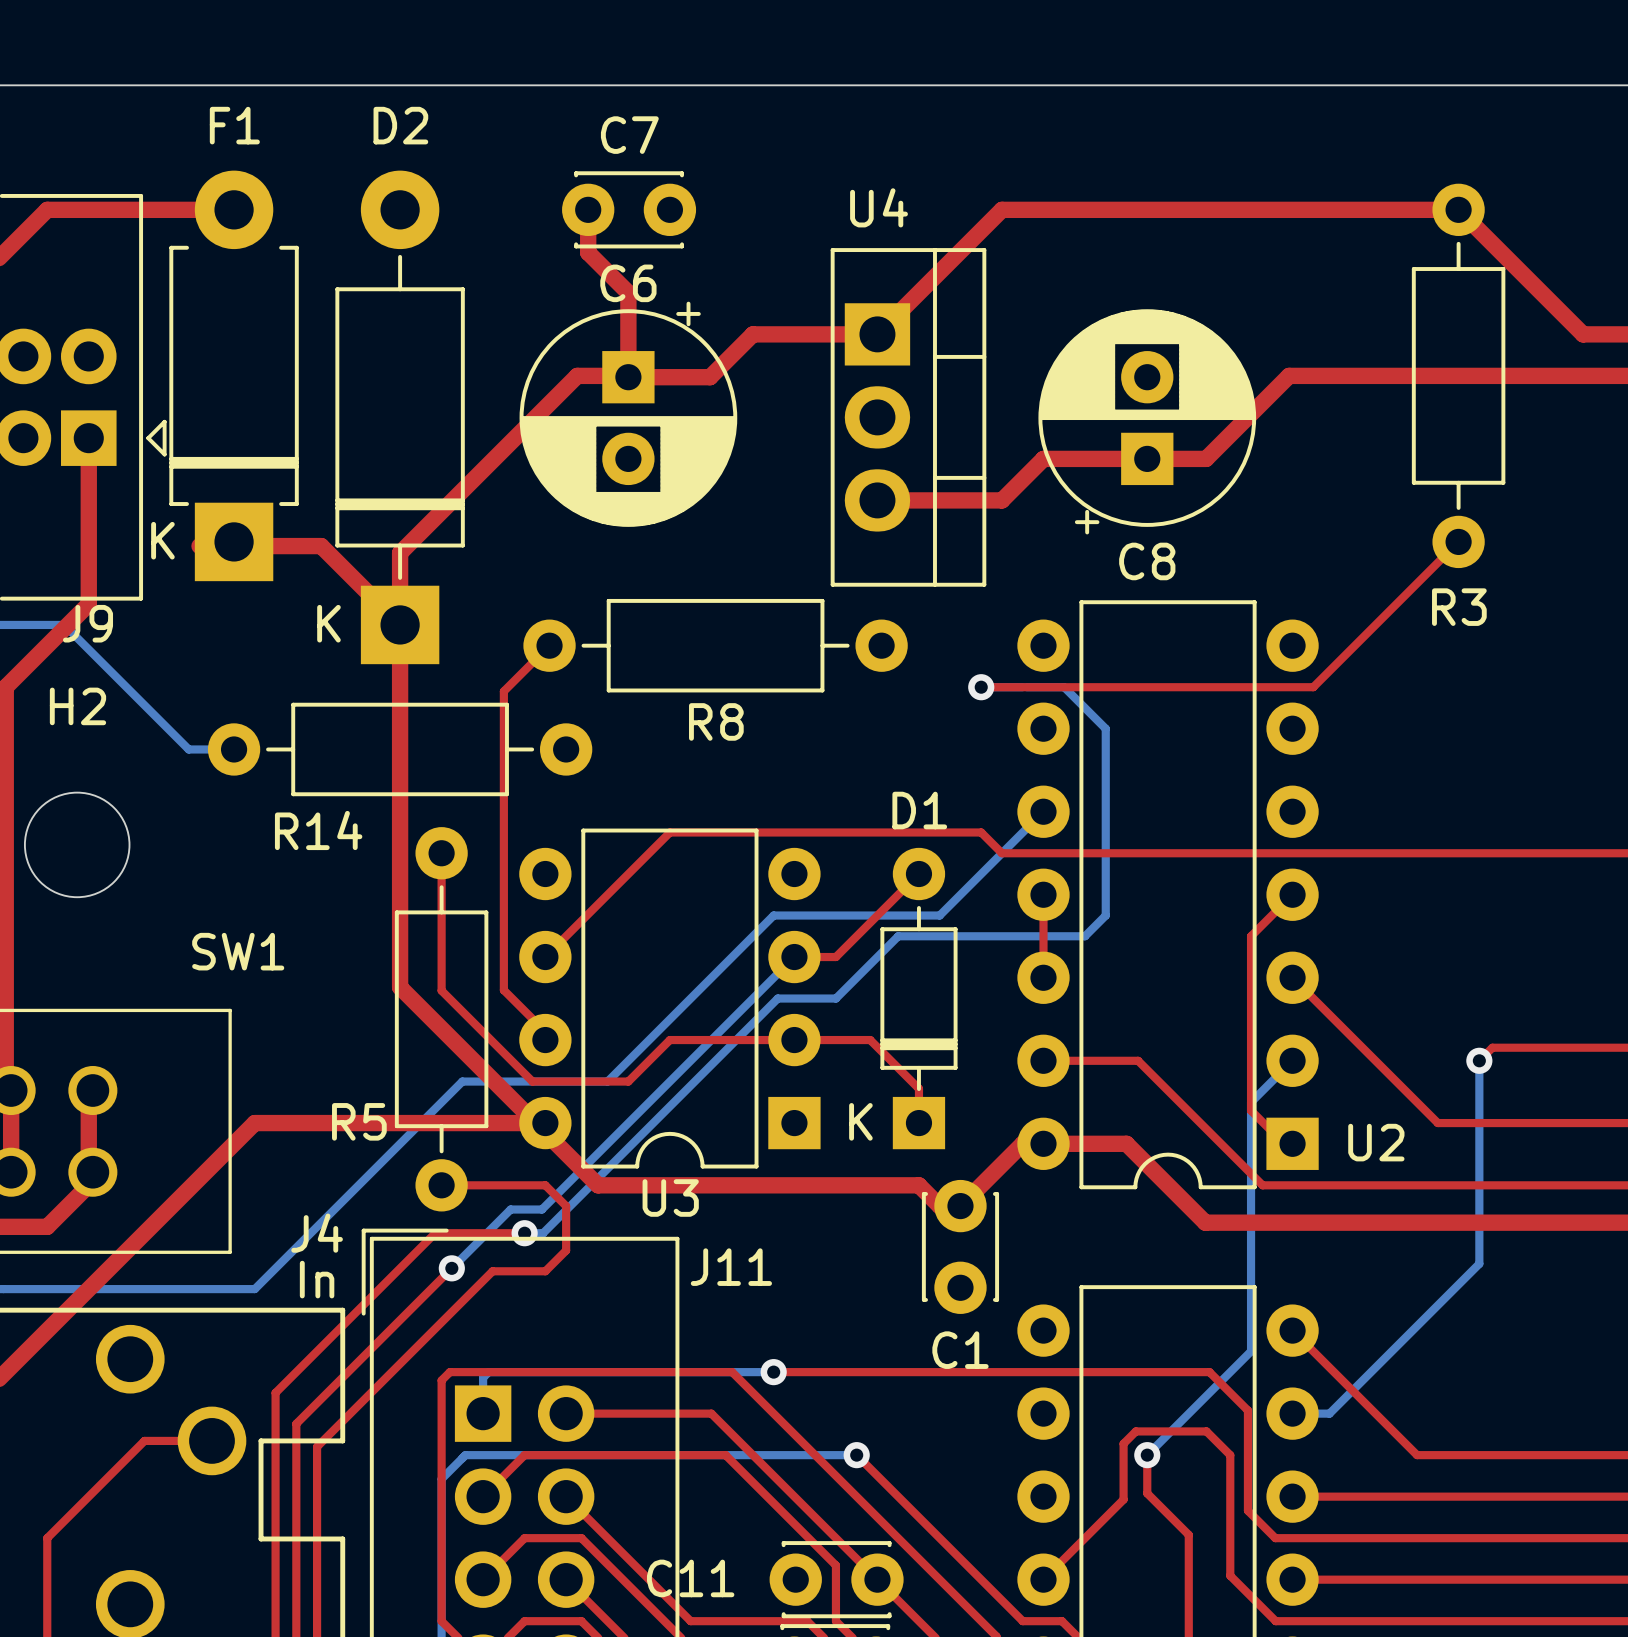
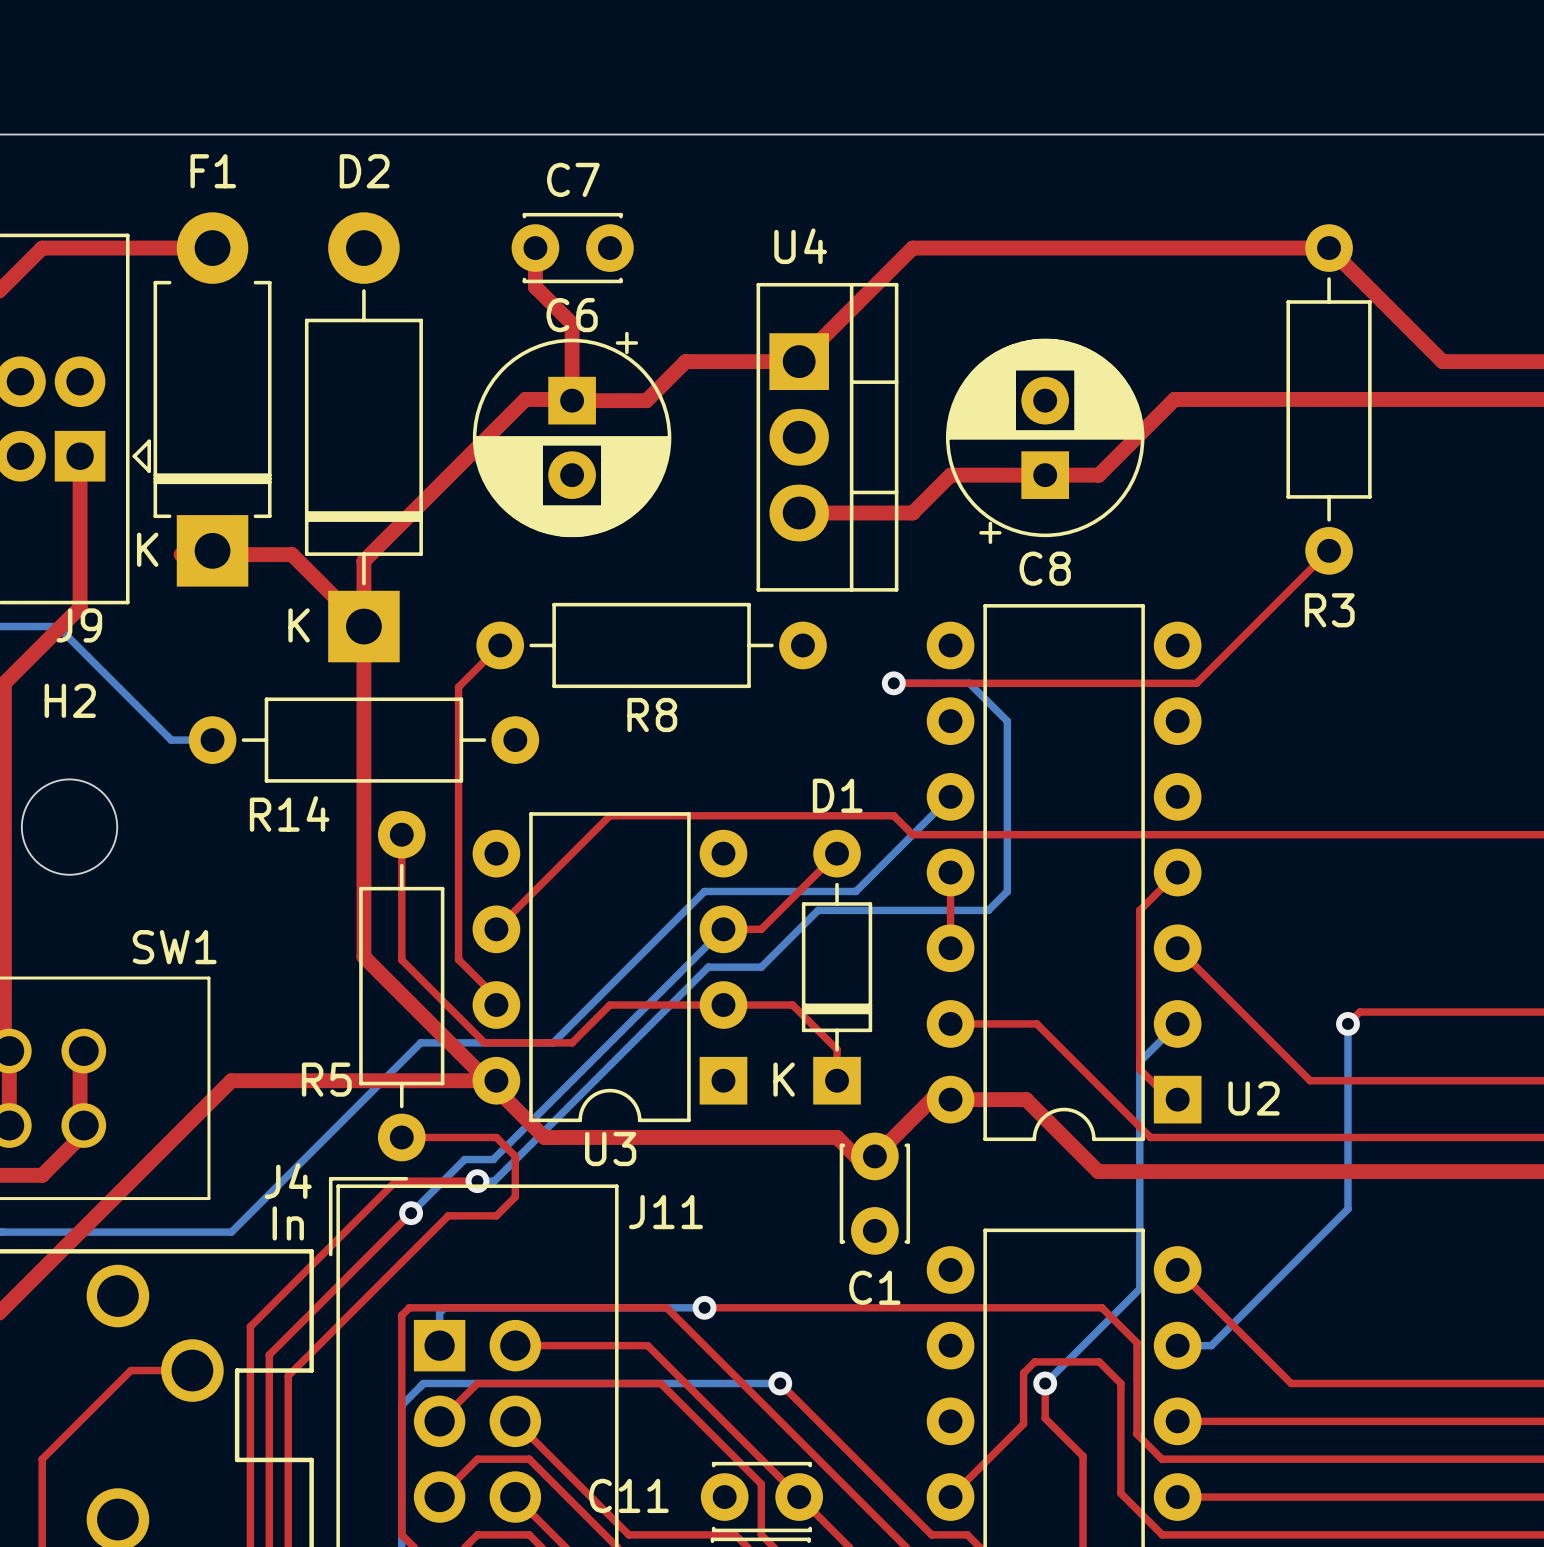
SW1 name position: SW1 (238, 951) -> SW1 (174, 947)

